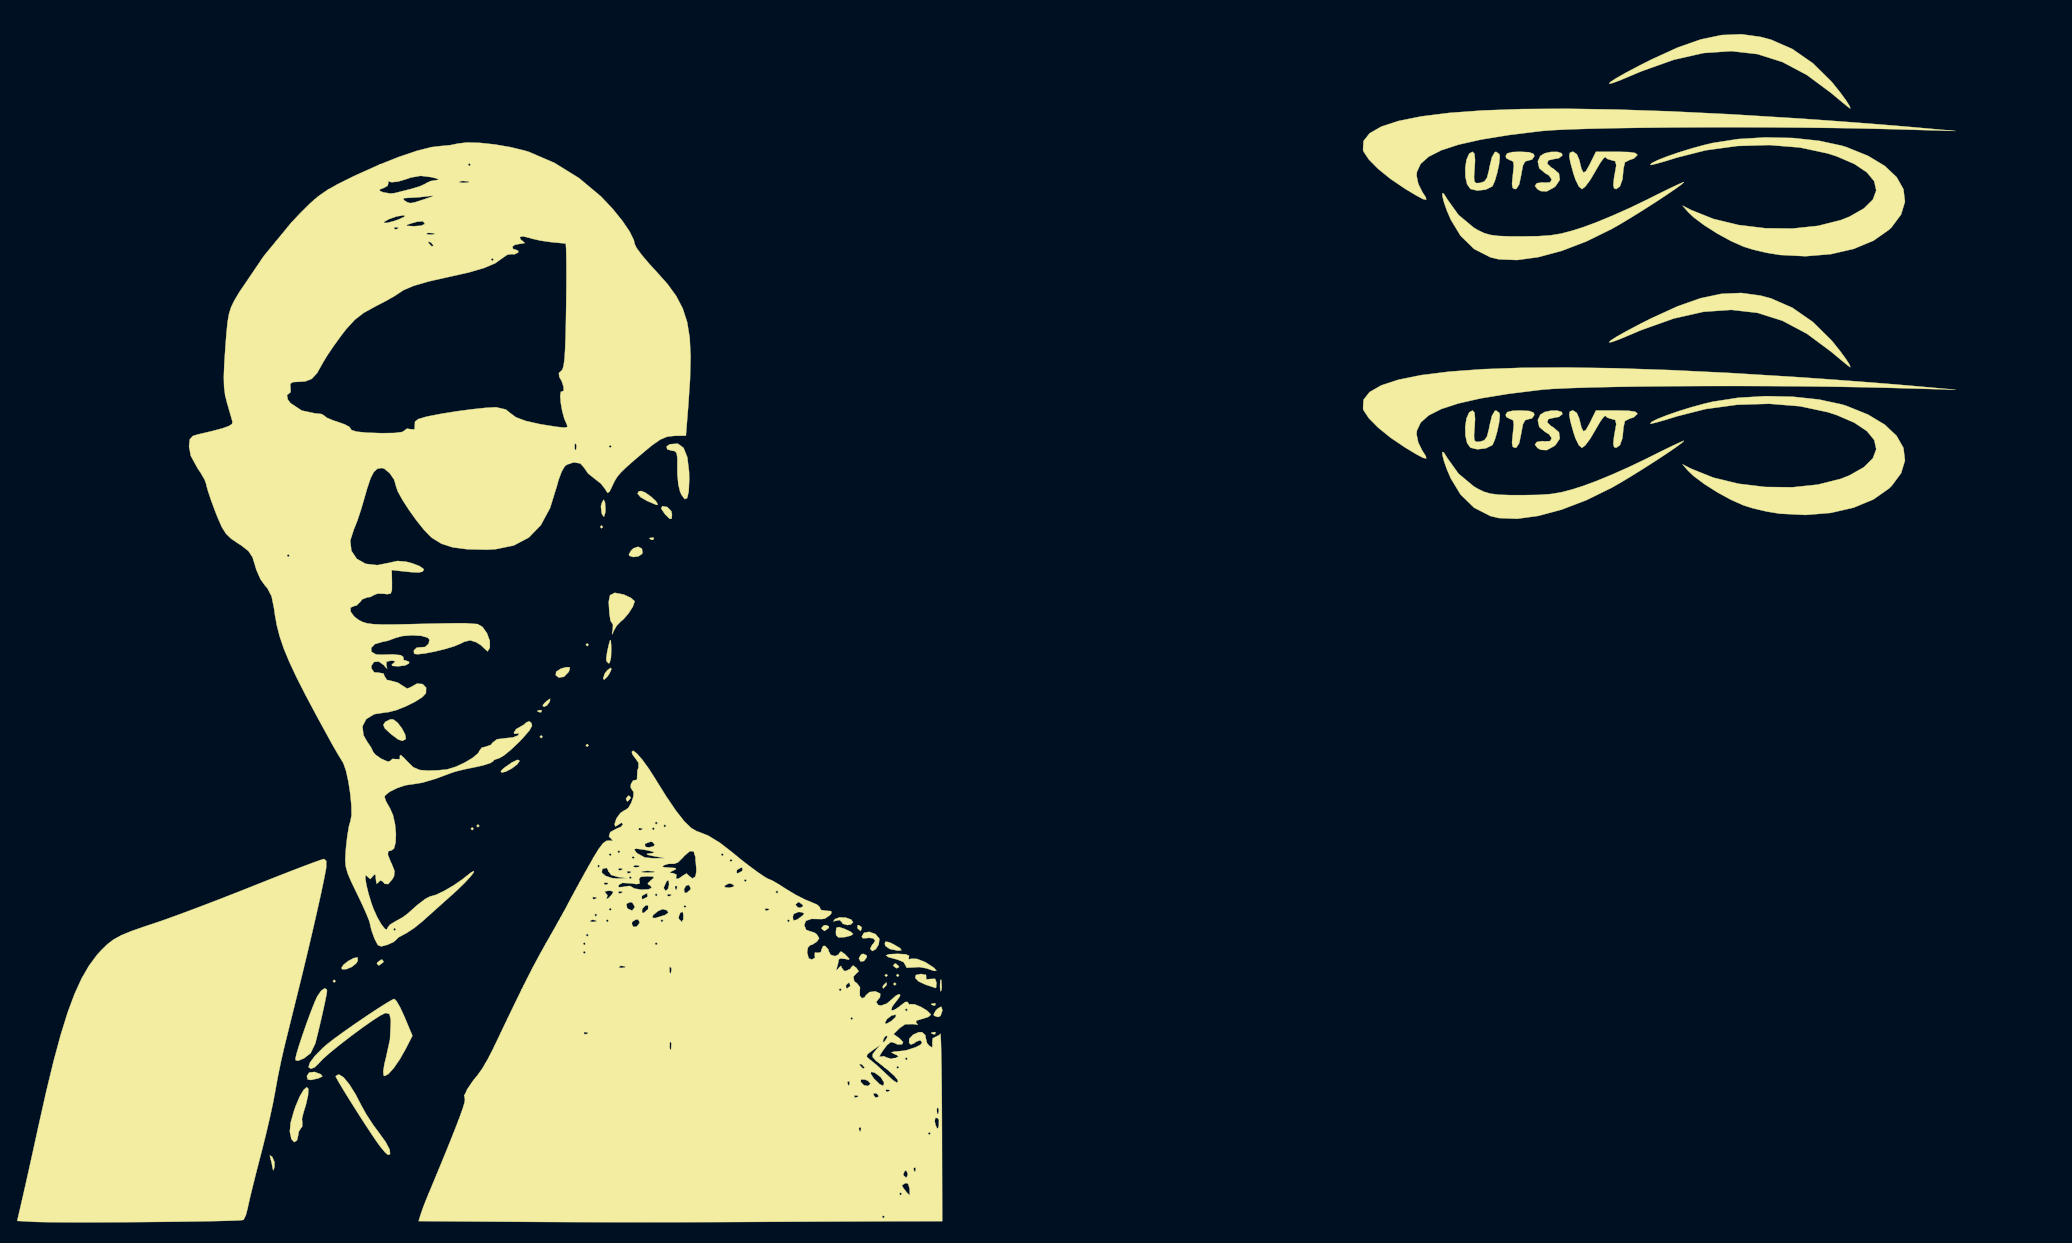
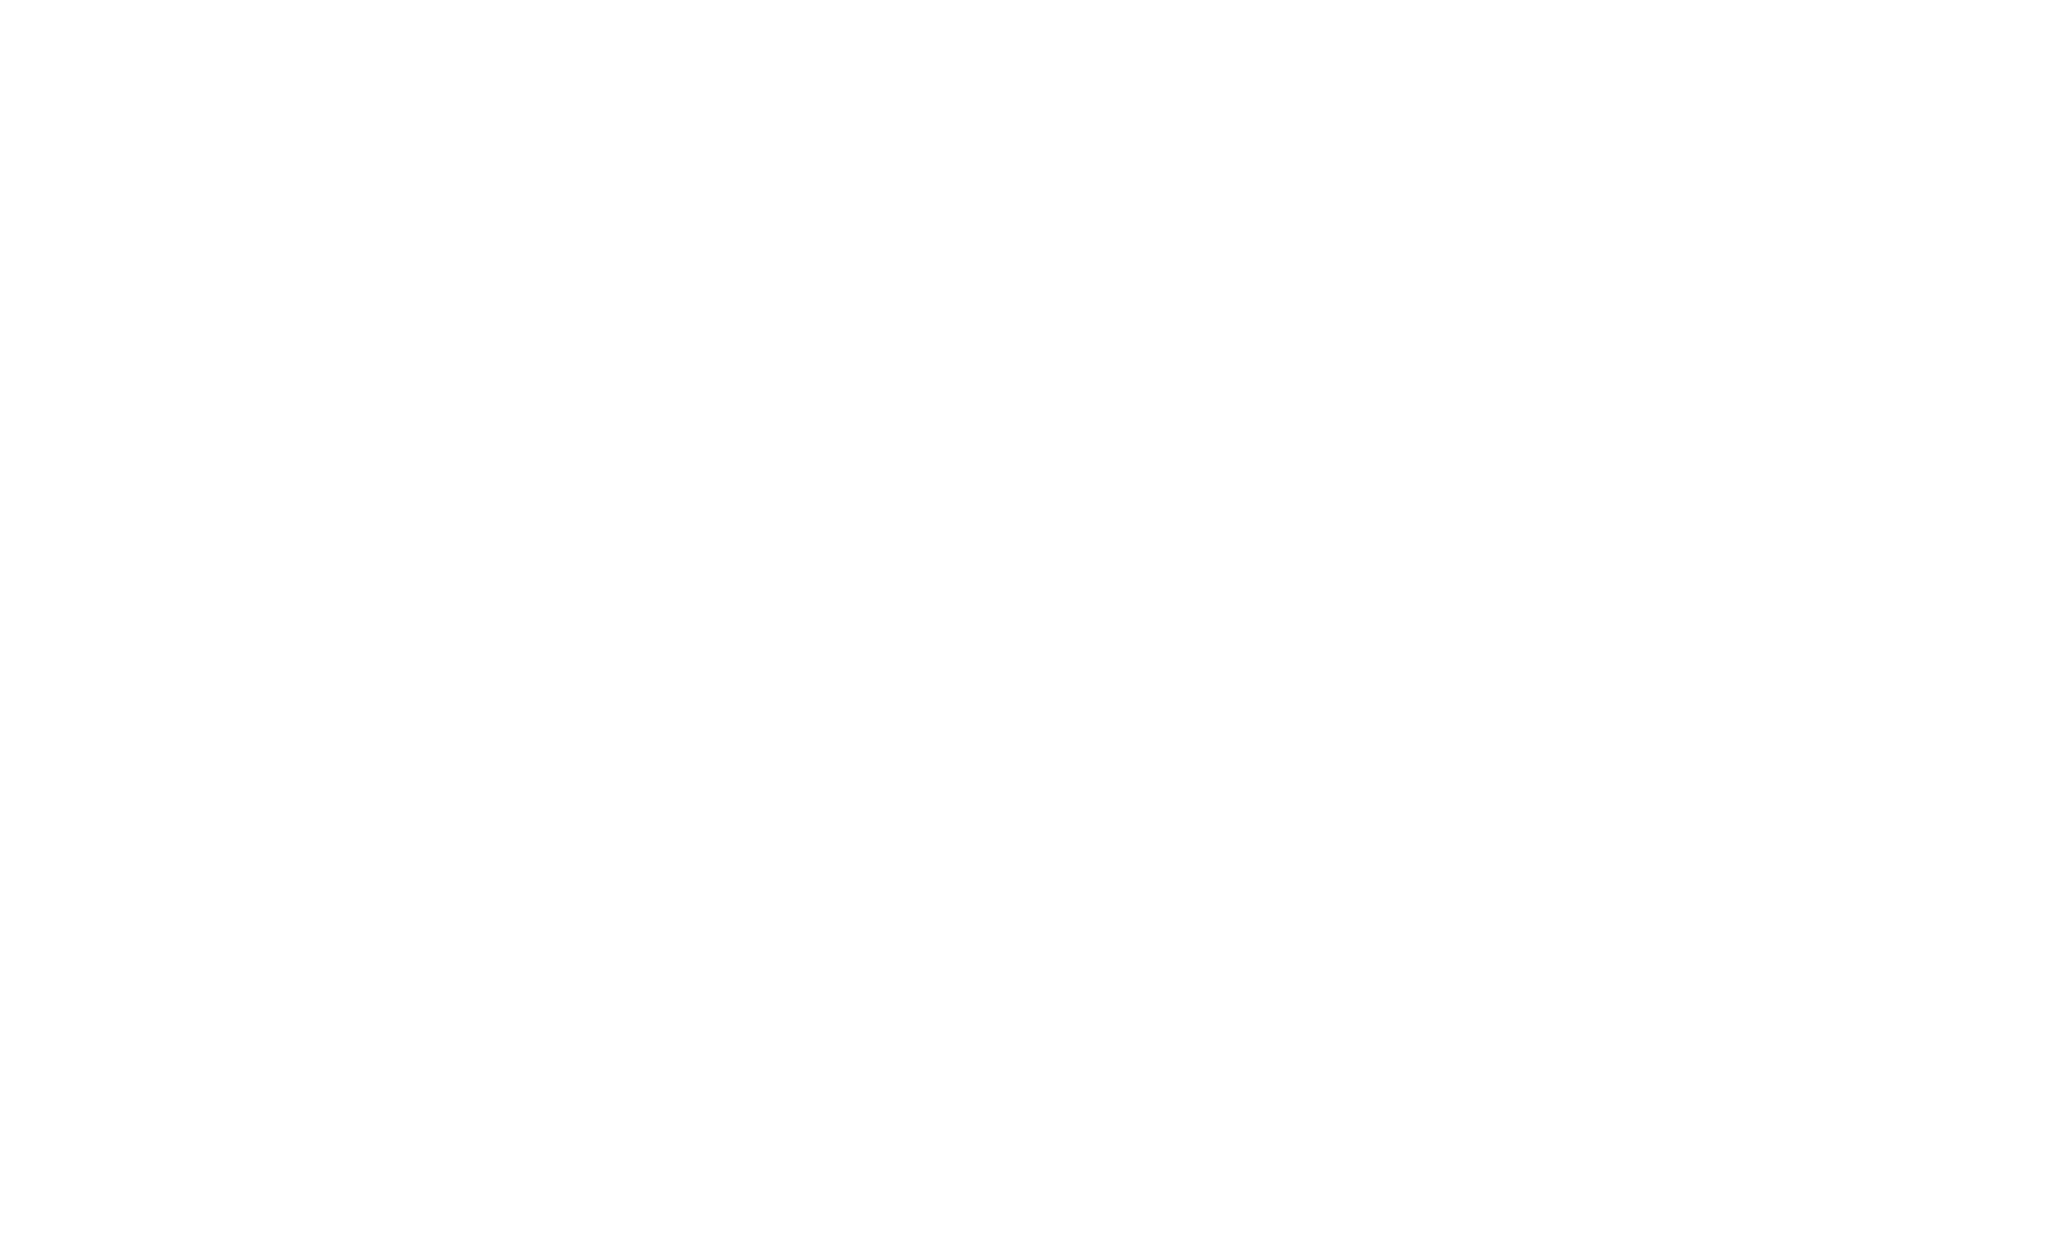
drawing: [1362, 34, 1956, 519] -> none
drawing: [17, 142, 943, 1223] -> none

